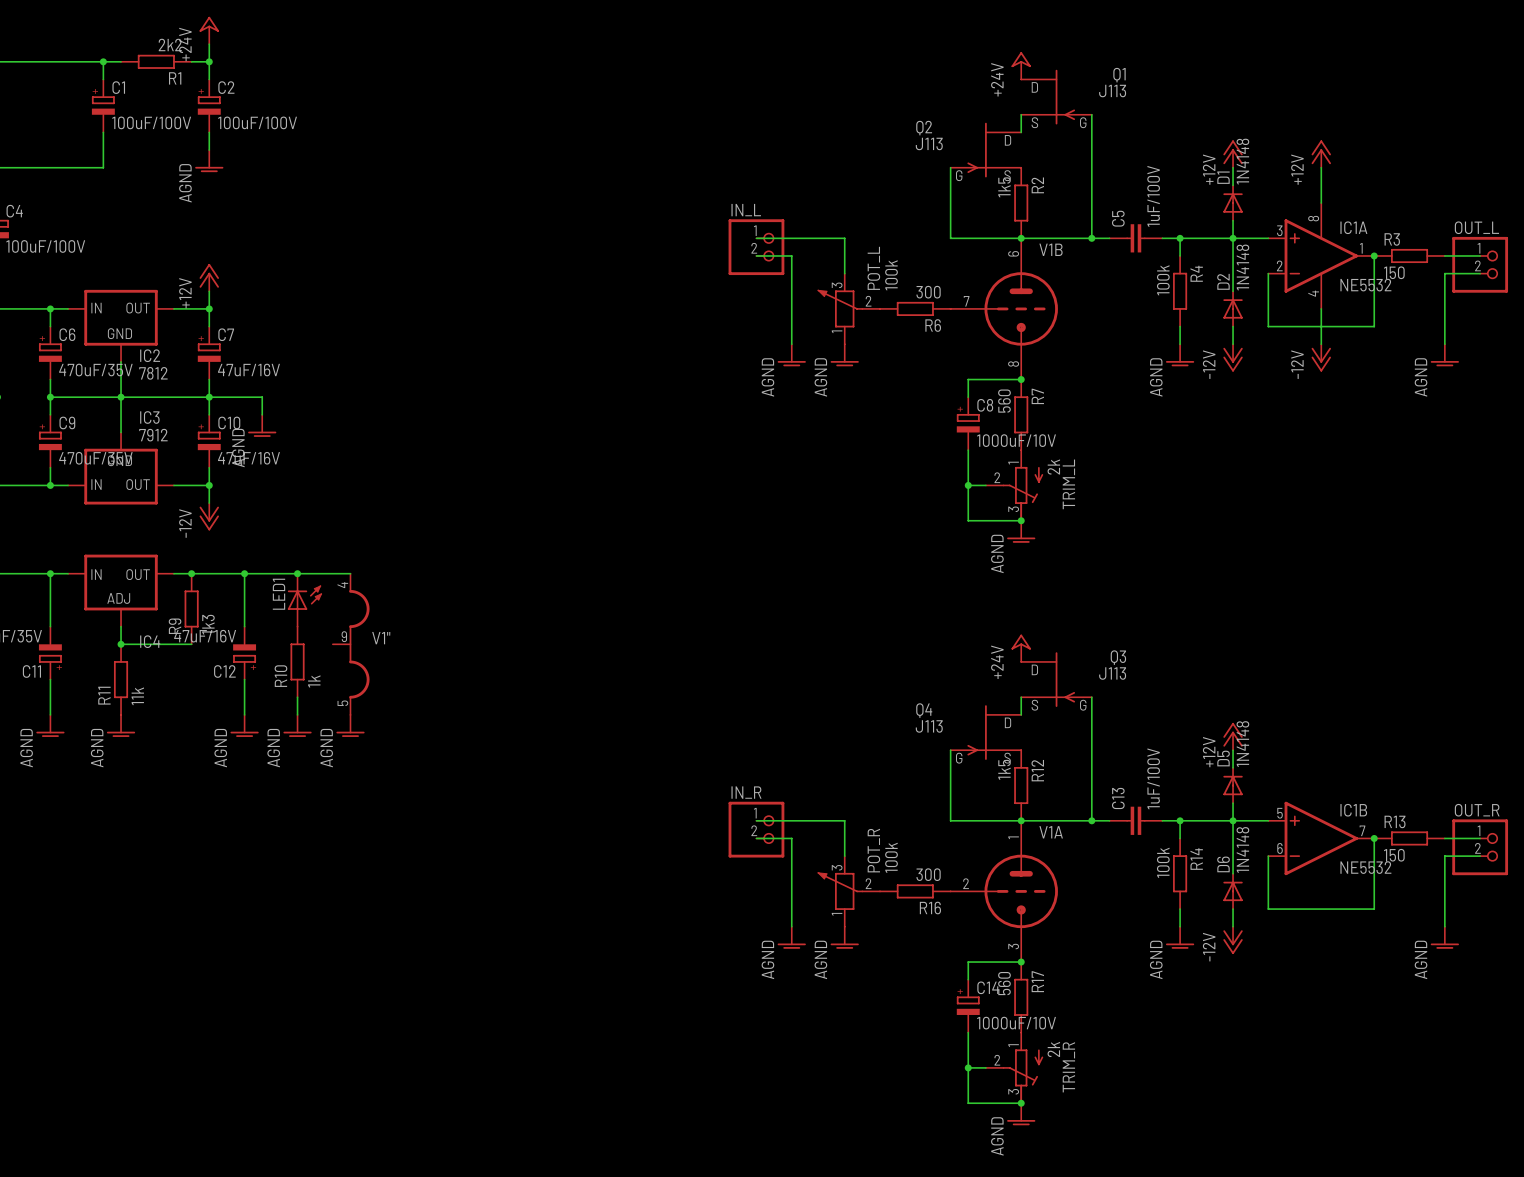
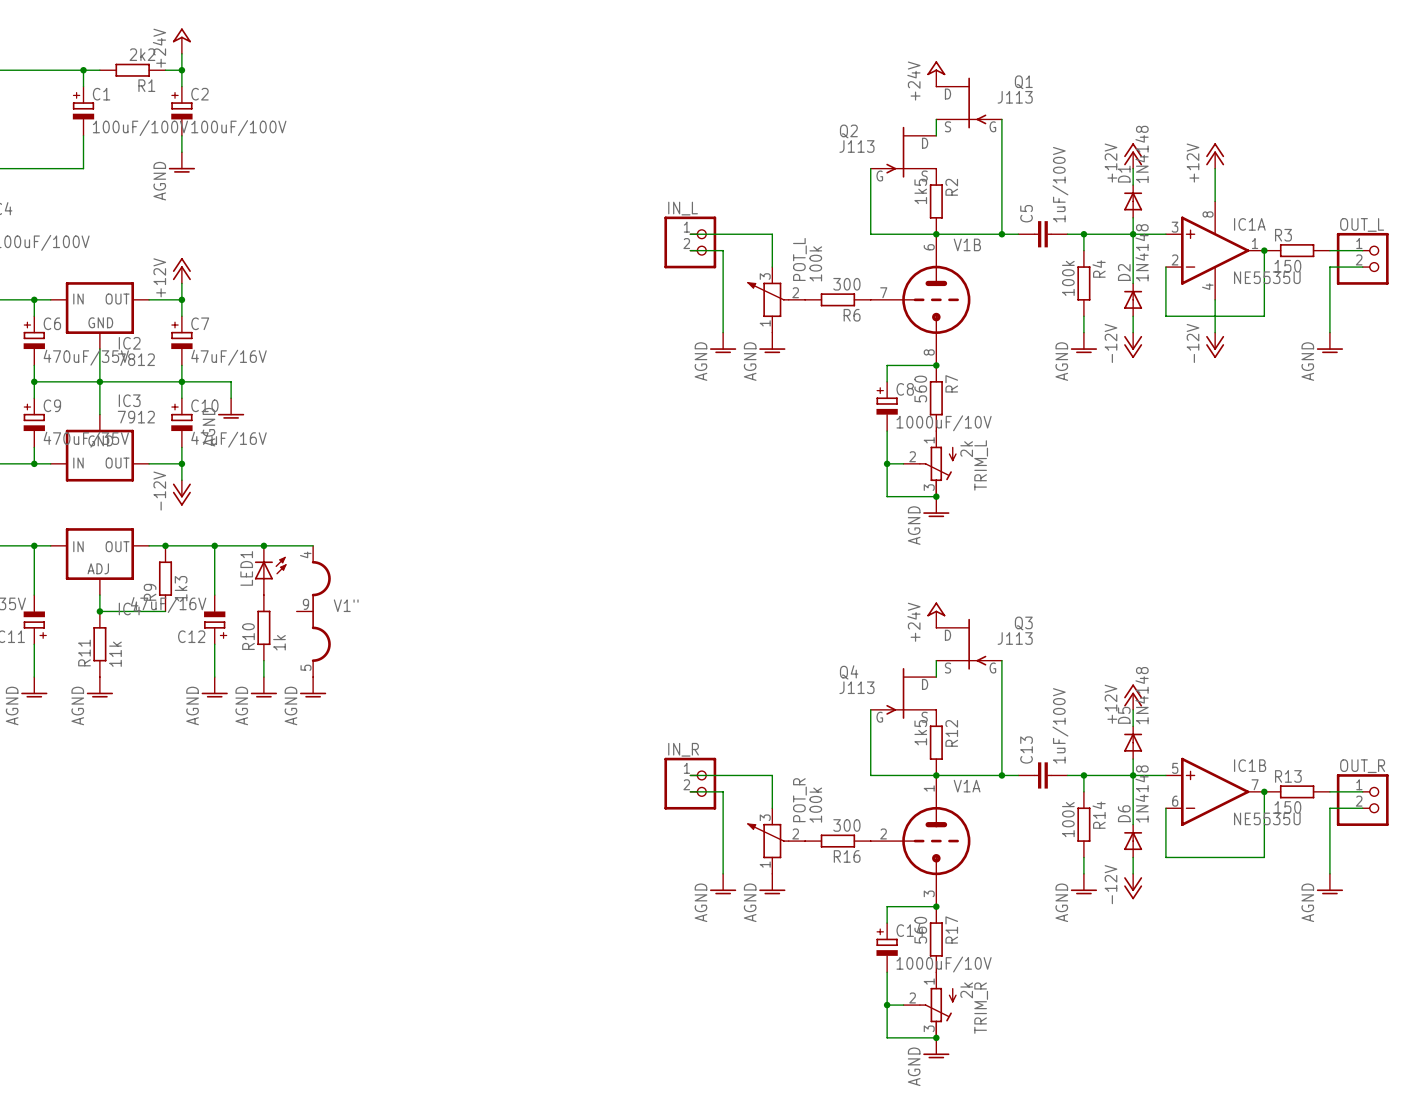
IC1A value: NE5532 (1365, 285) -> NE5535U (1267, 277)
IC1B value: NE5532 (1365, 867) -> NE5535U (1267, 818)

